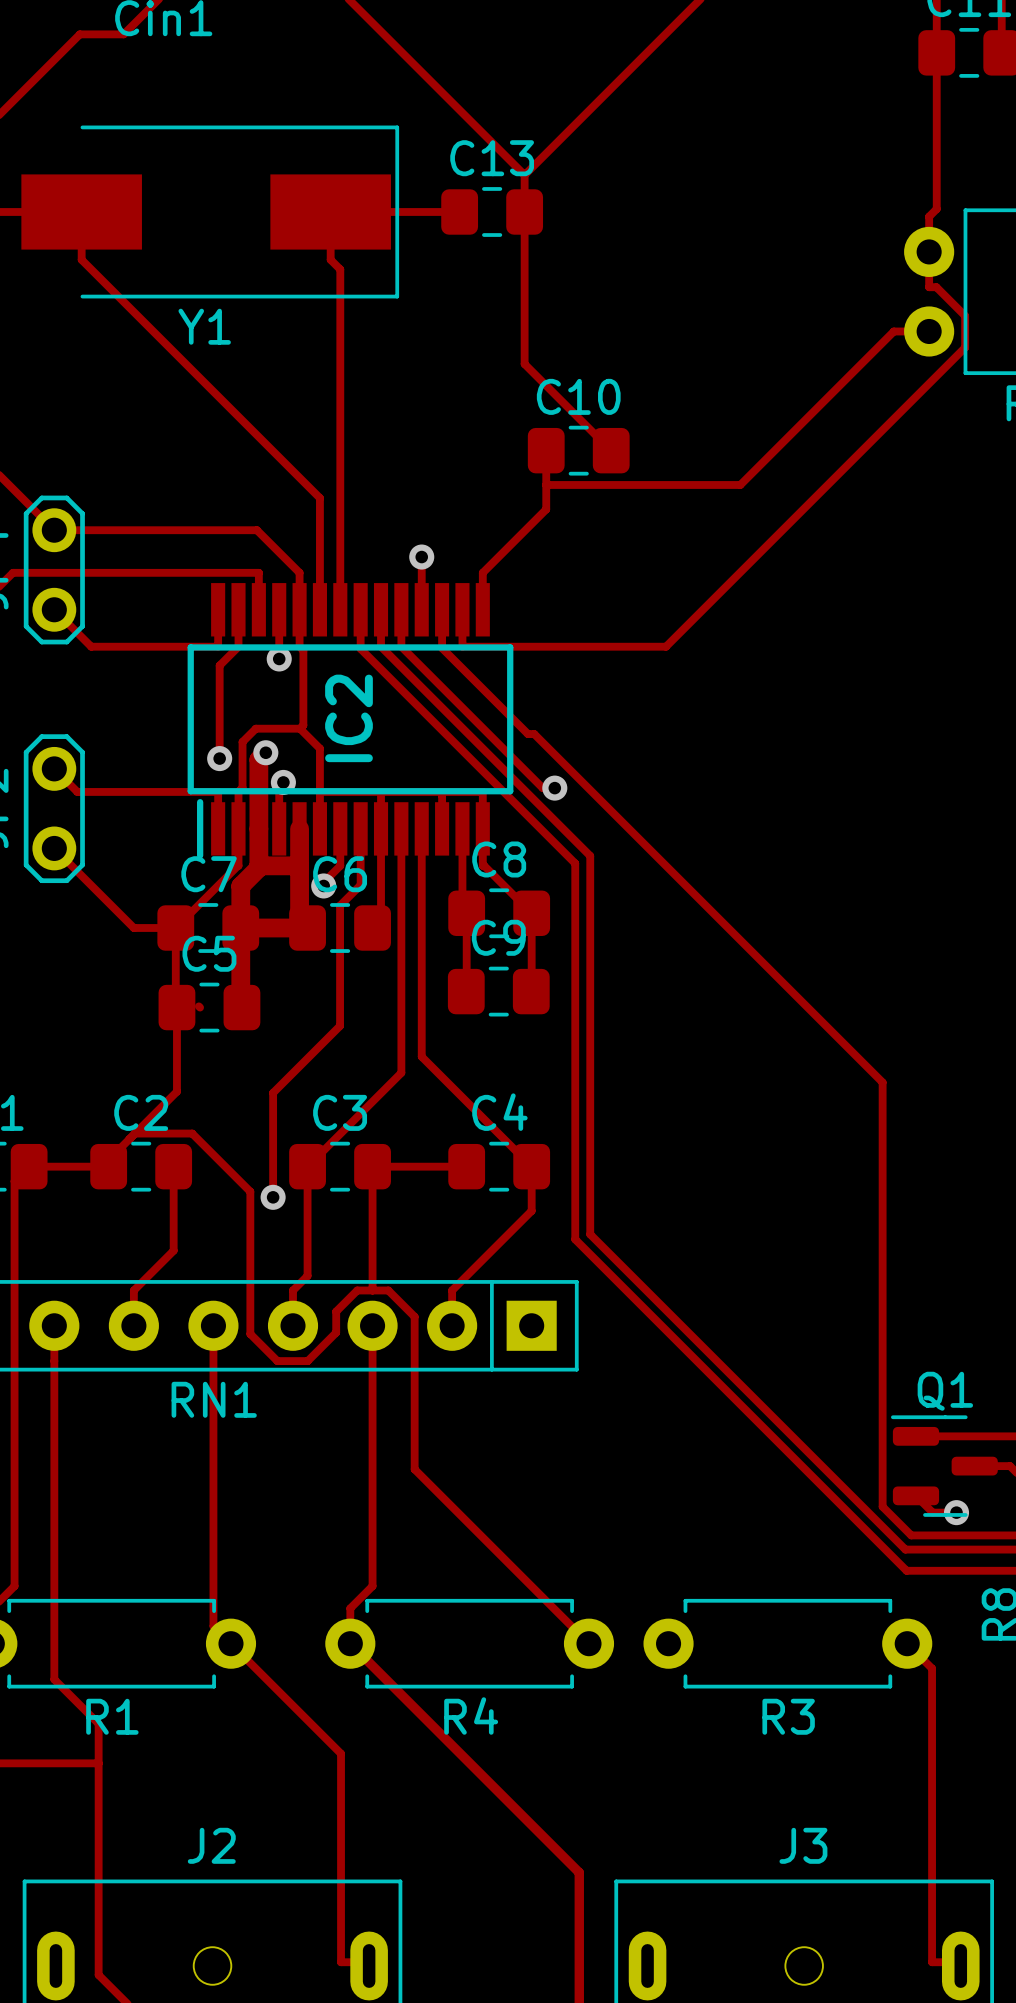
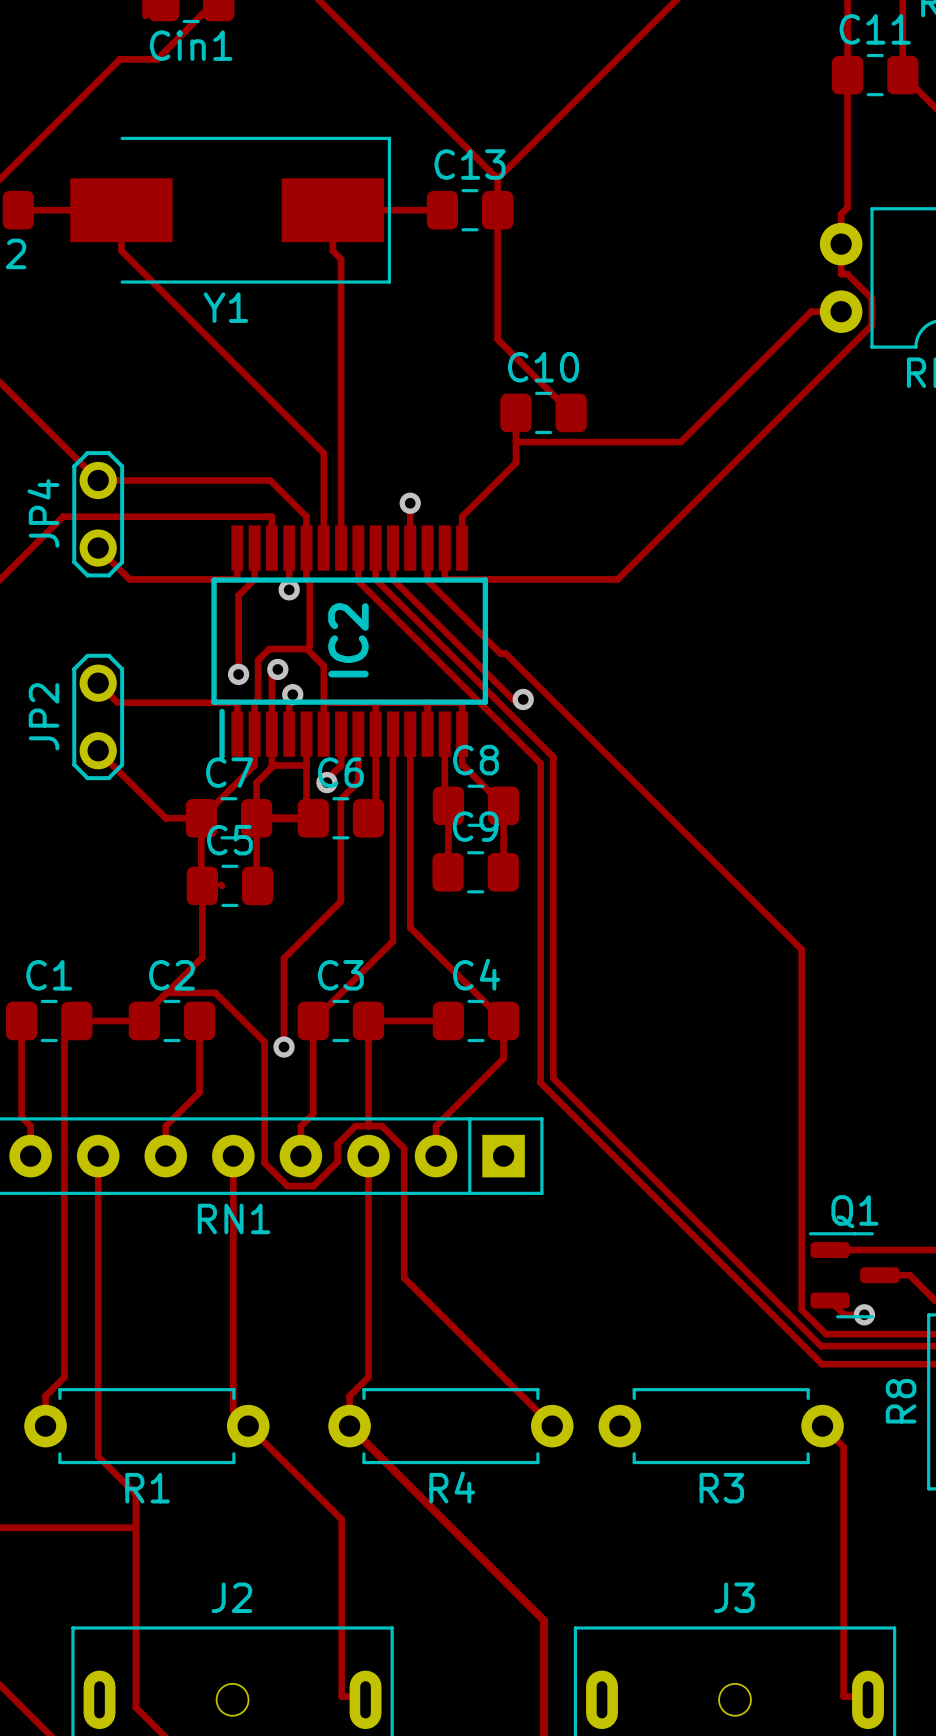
track width: thick (265, 752) (258, 759) (258, 868) (240, 886) (241, 1007) -> thin (277, 669) (271, 675) (271, 767) (256, 782) (257, 885)
track width: thick (299, 828) (299, 920) (307, 928) (240, 928) -> thin (306, 734) (306, 811) (313, 818) (256, 818)
track width: thick (258, 865) (299, 865) -> thin (271, 765) (306, 765)

